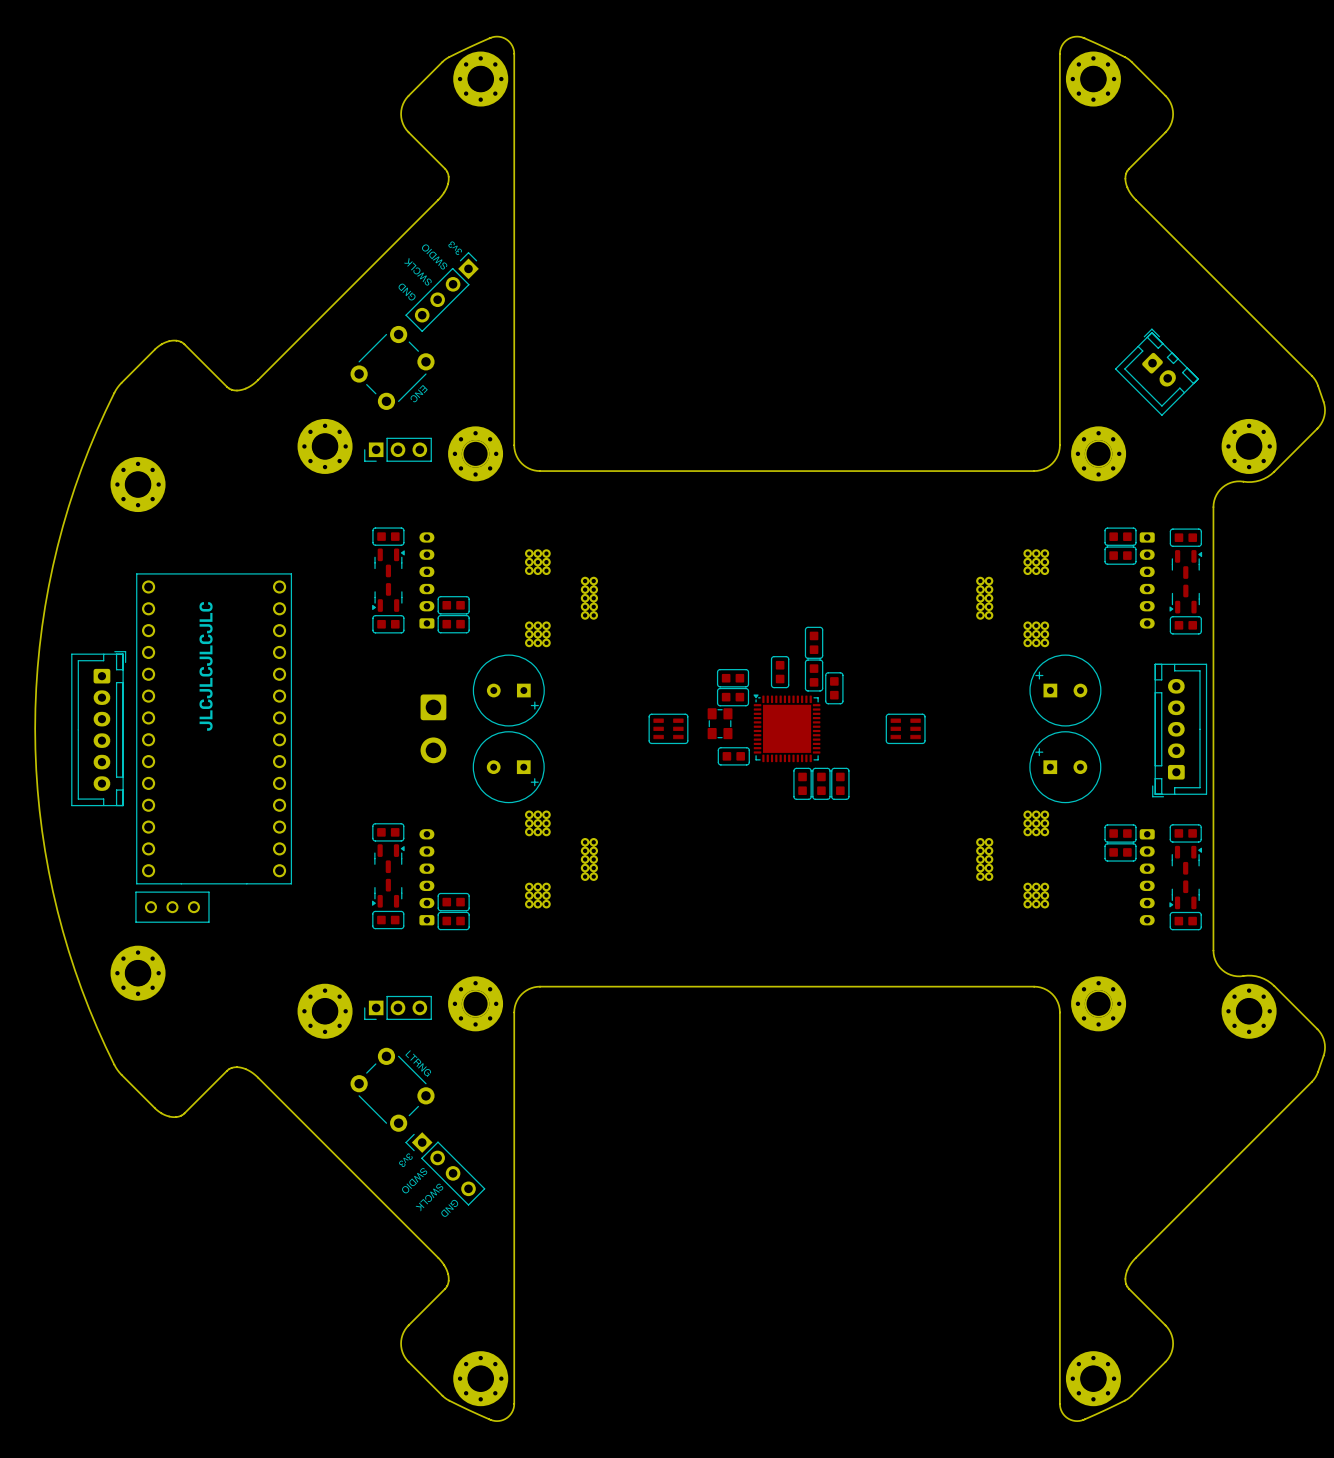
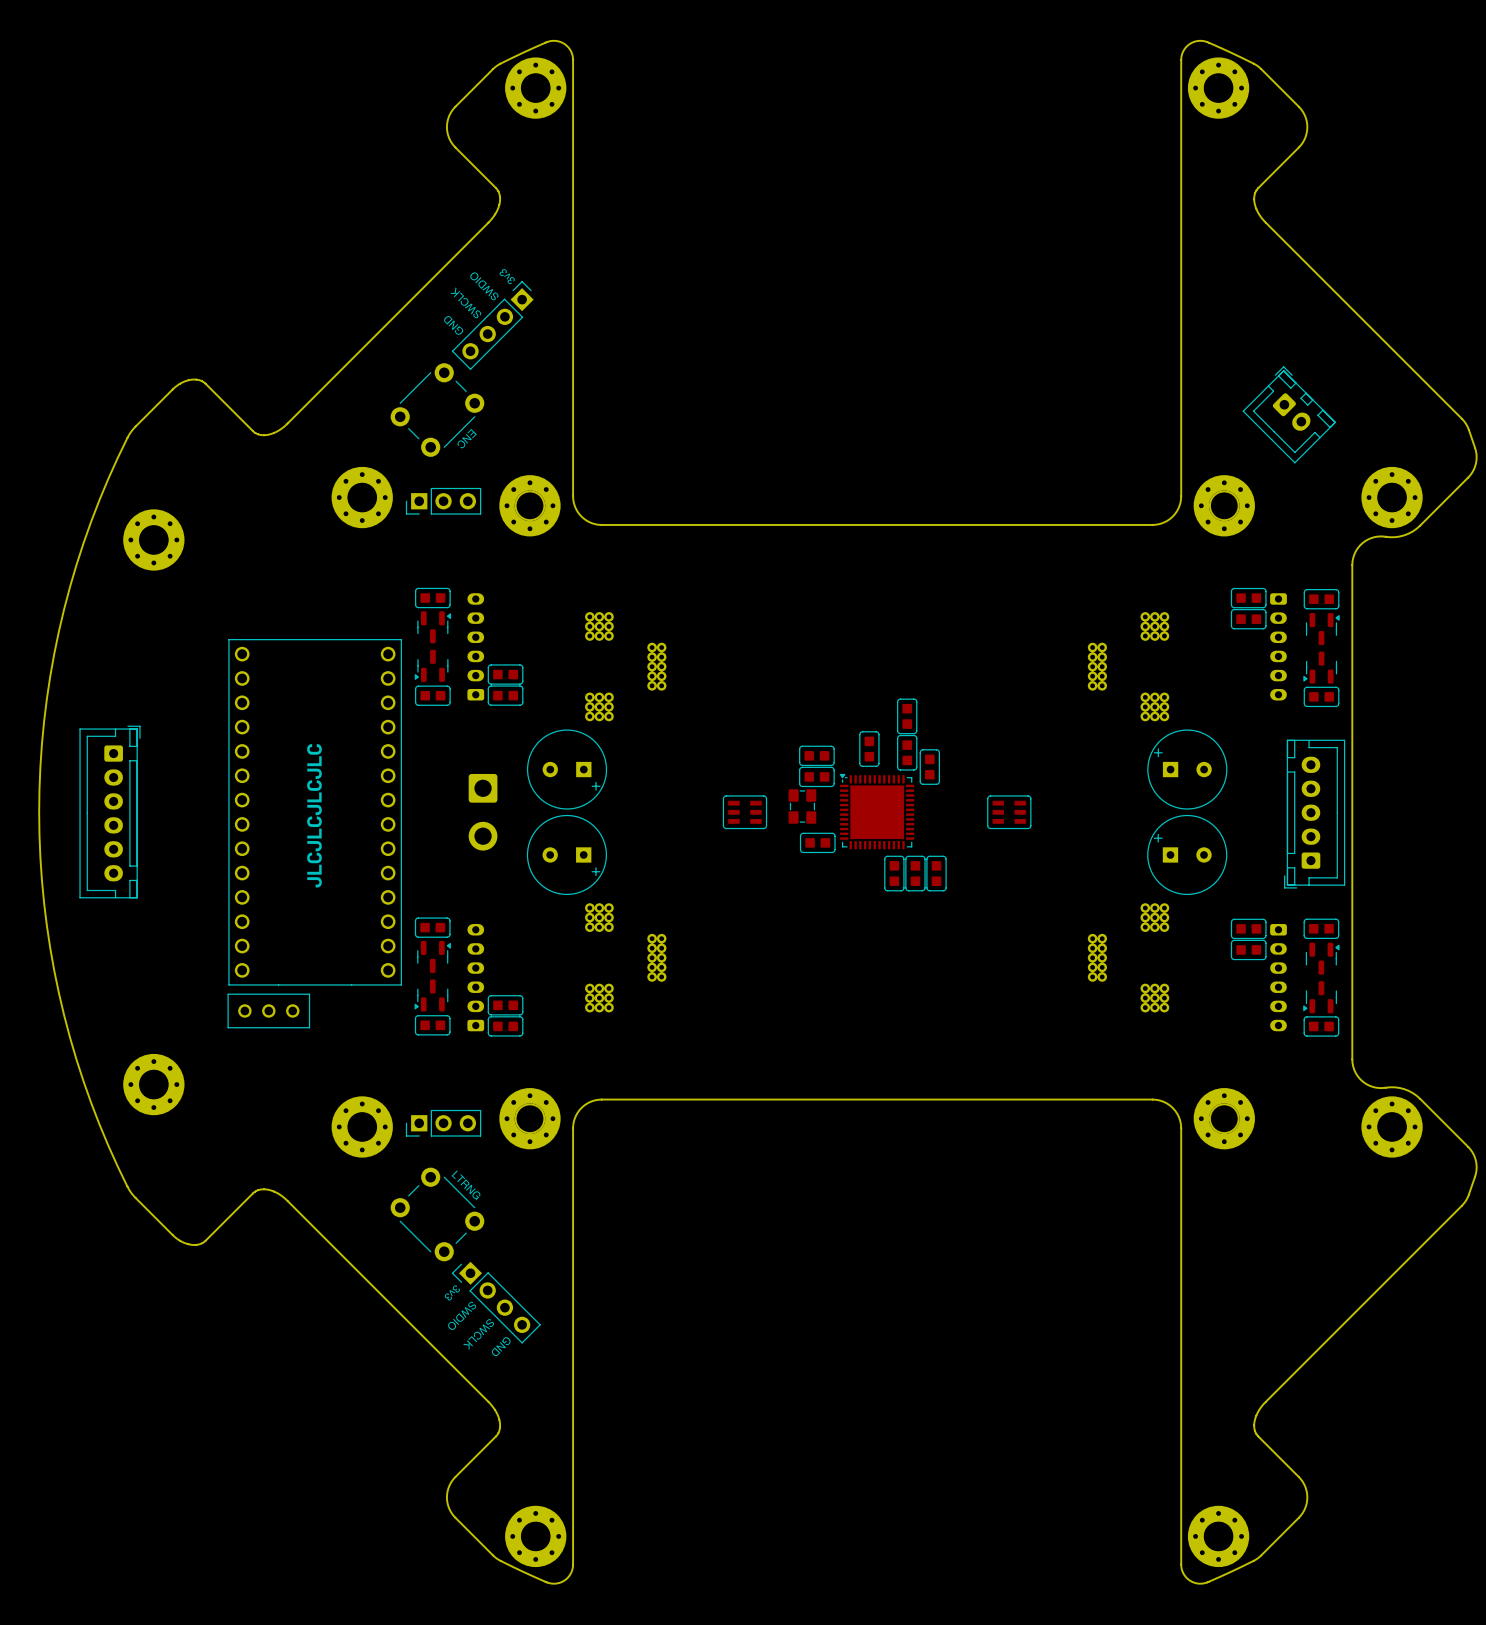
text position: JLCJLCJLCJLC (206, 666) -> JLCJLCJLCJLC (314, 815)
part position: (214, 728) -> (315, 812)
part position: (172, 907) -> (268, 1010)

